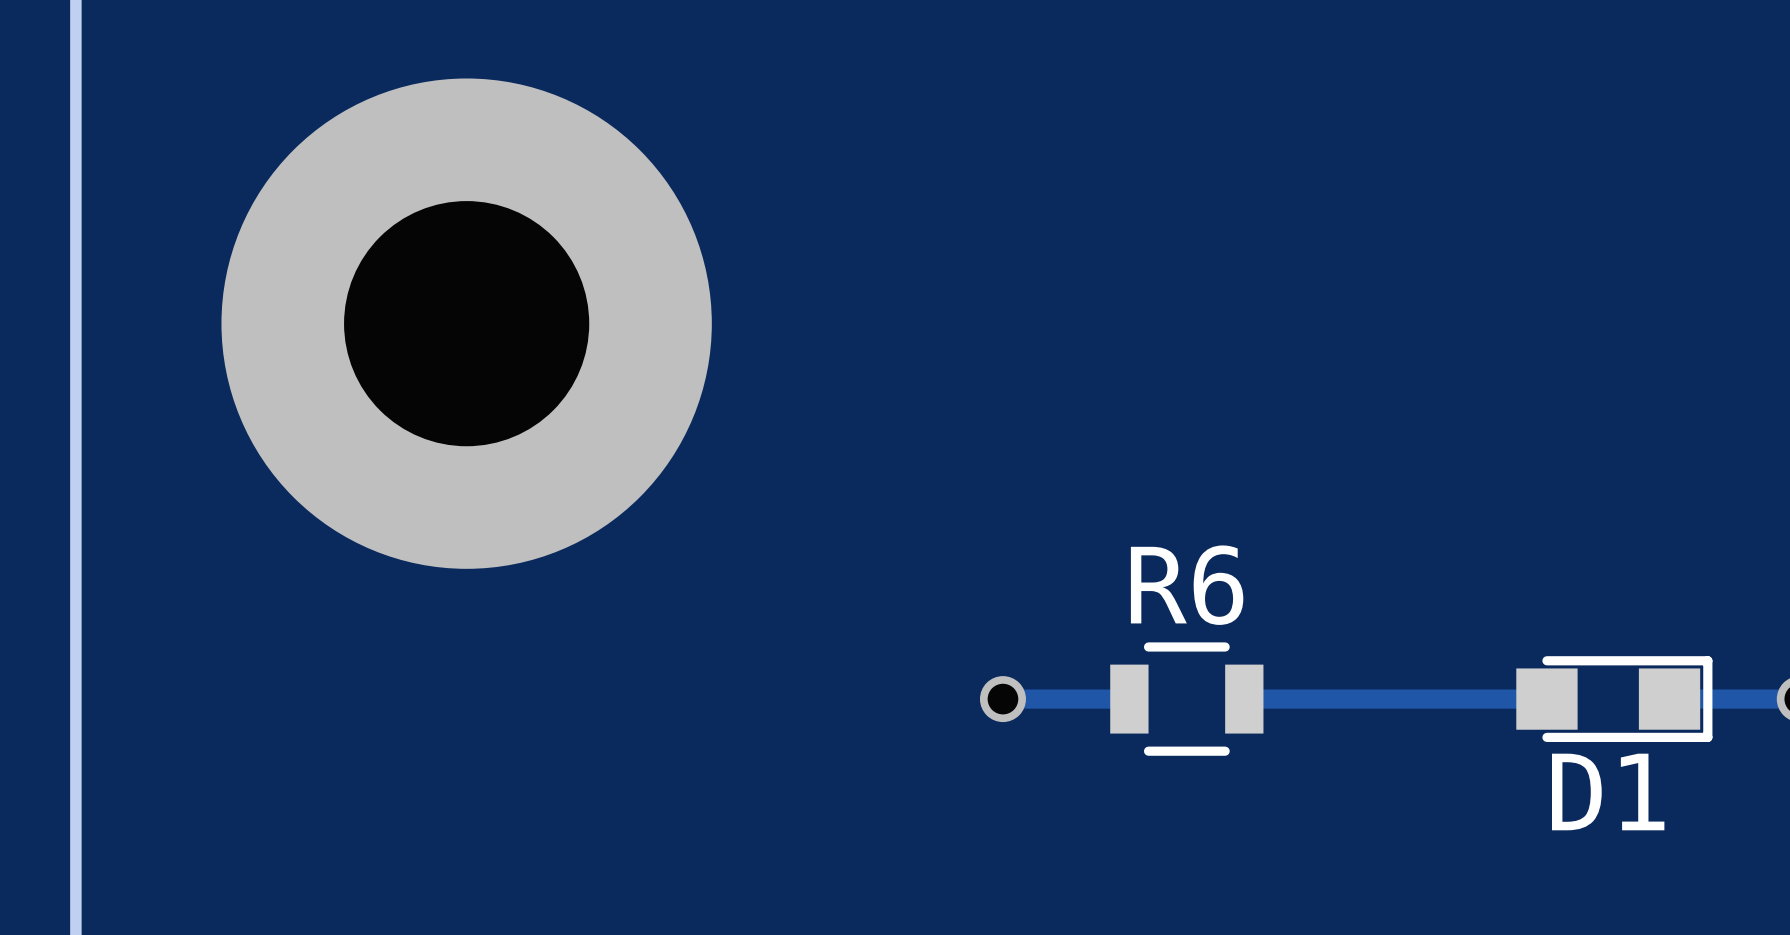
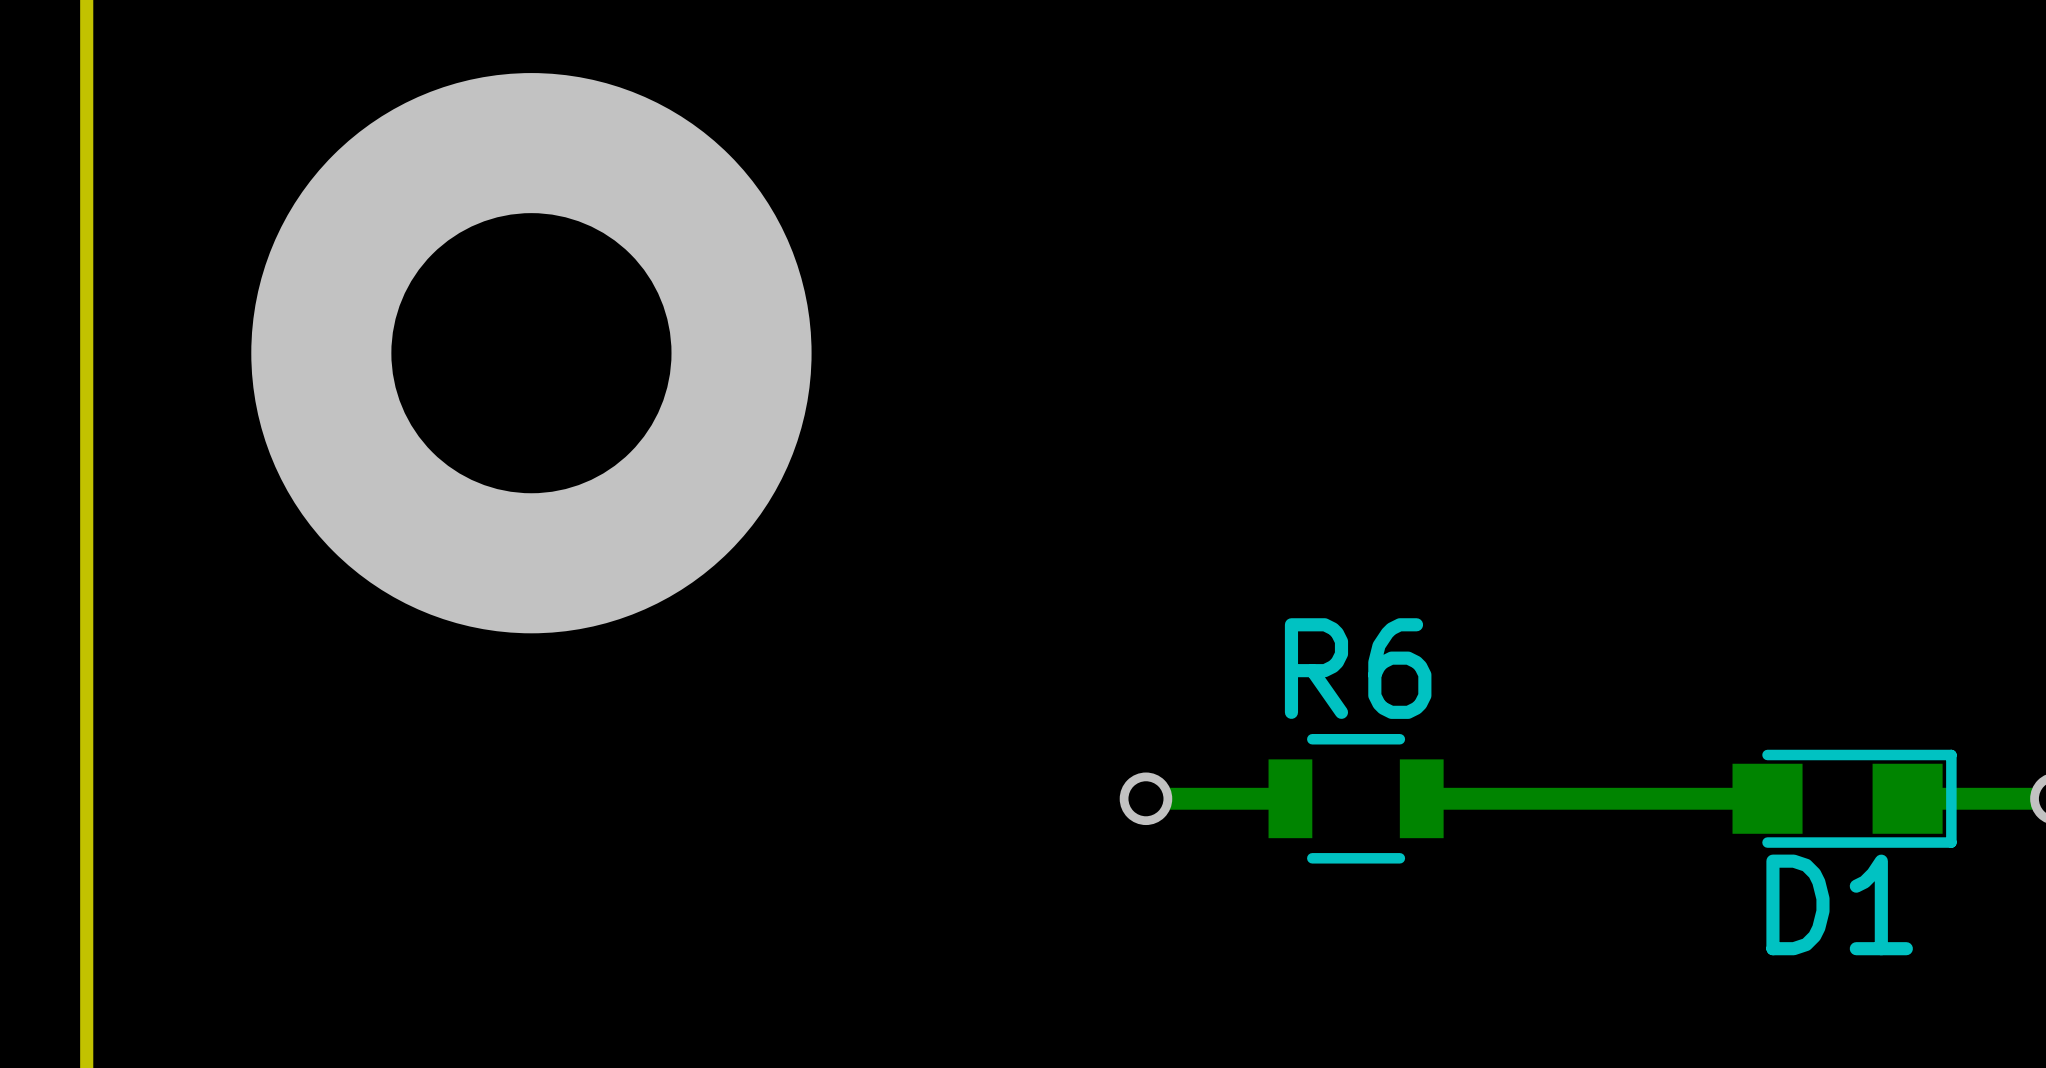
via position: (466, 323) -> (531, 353)

